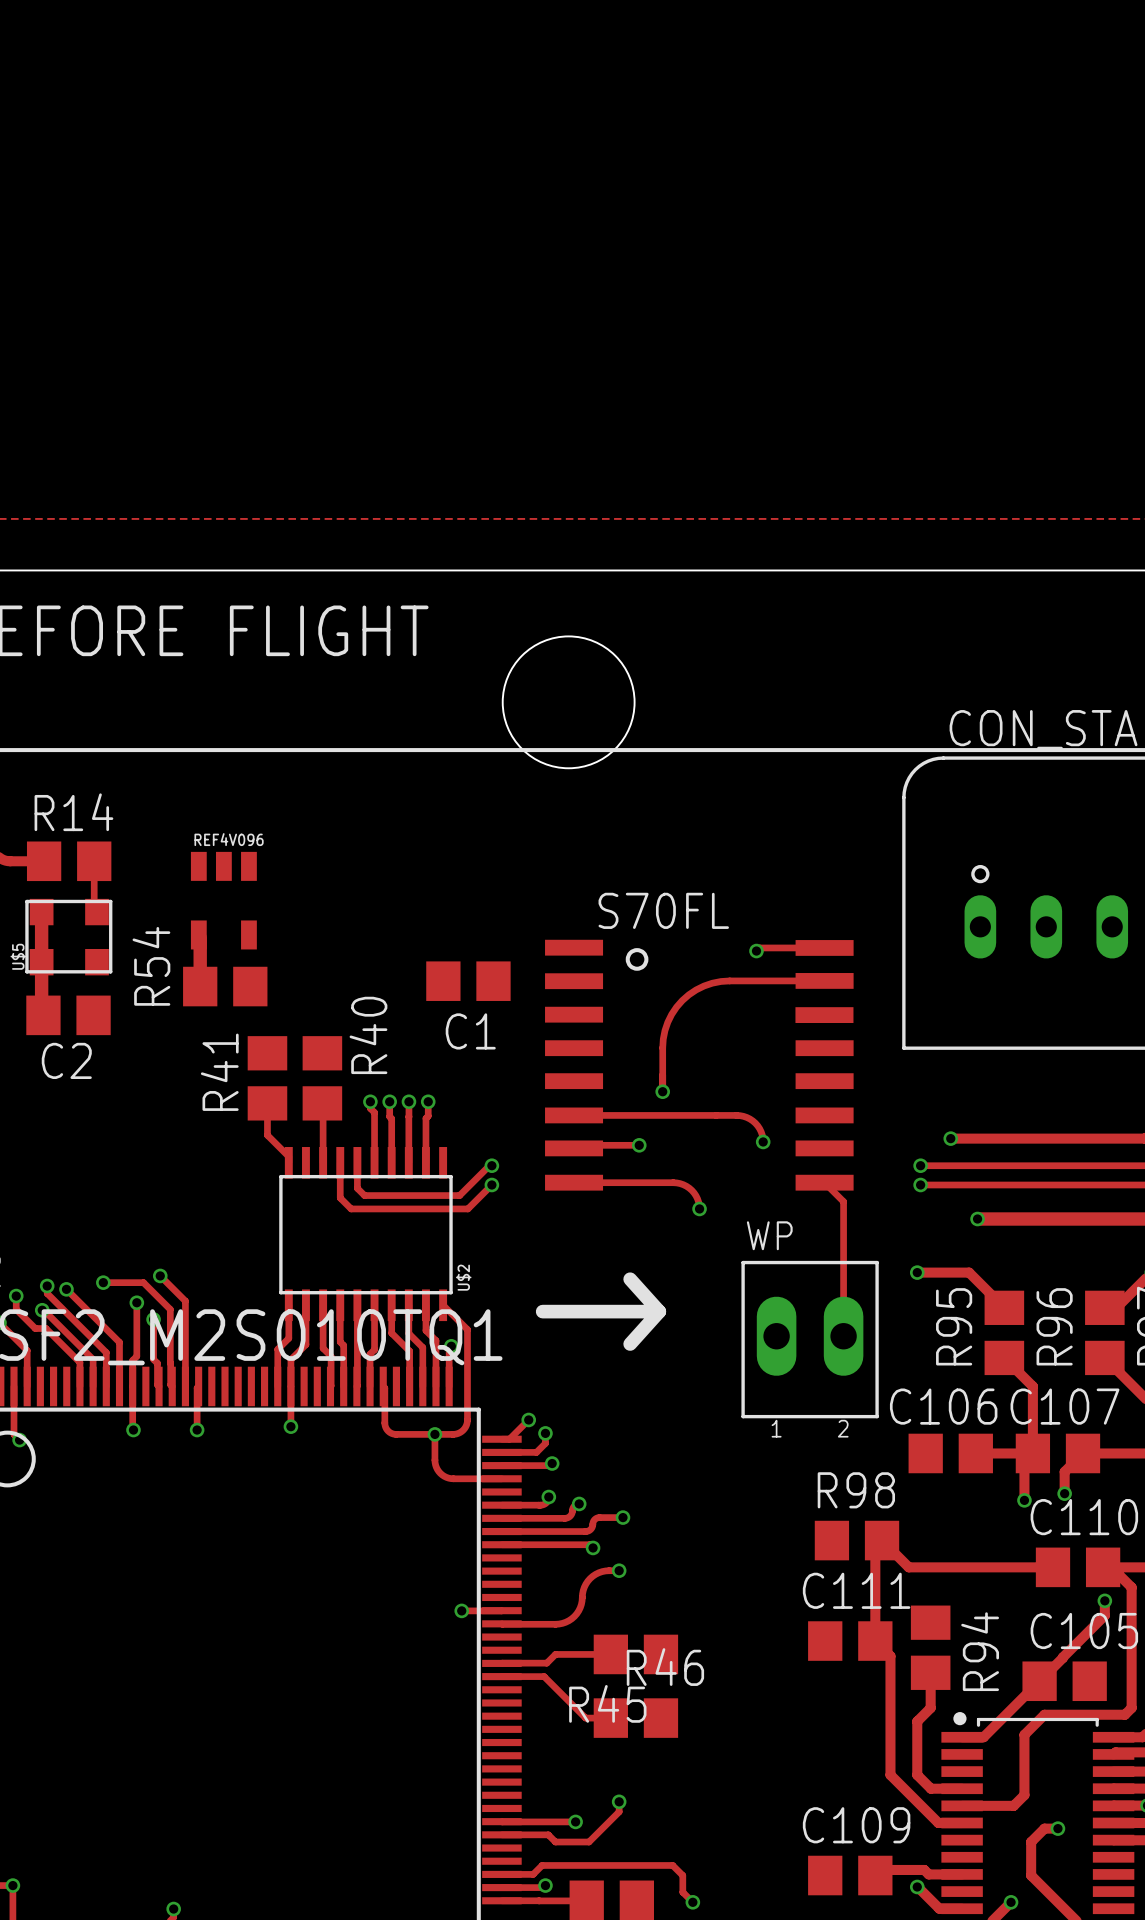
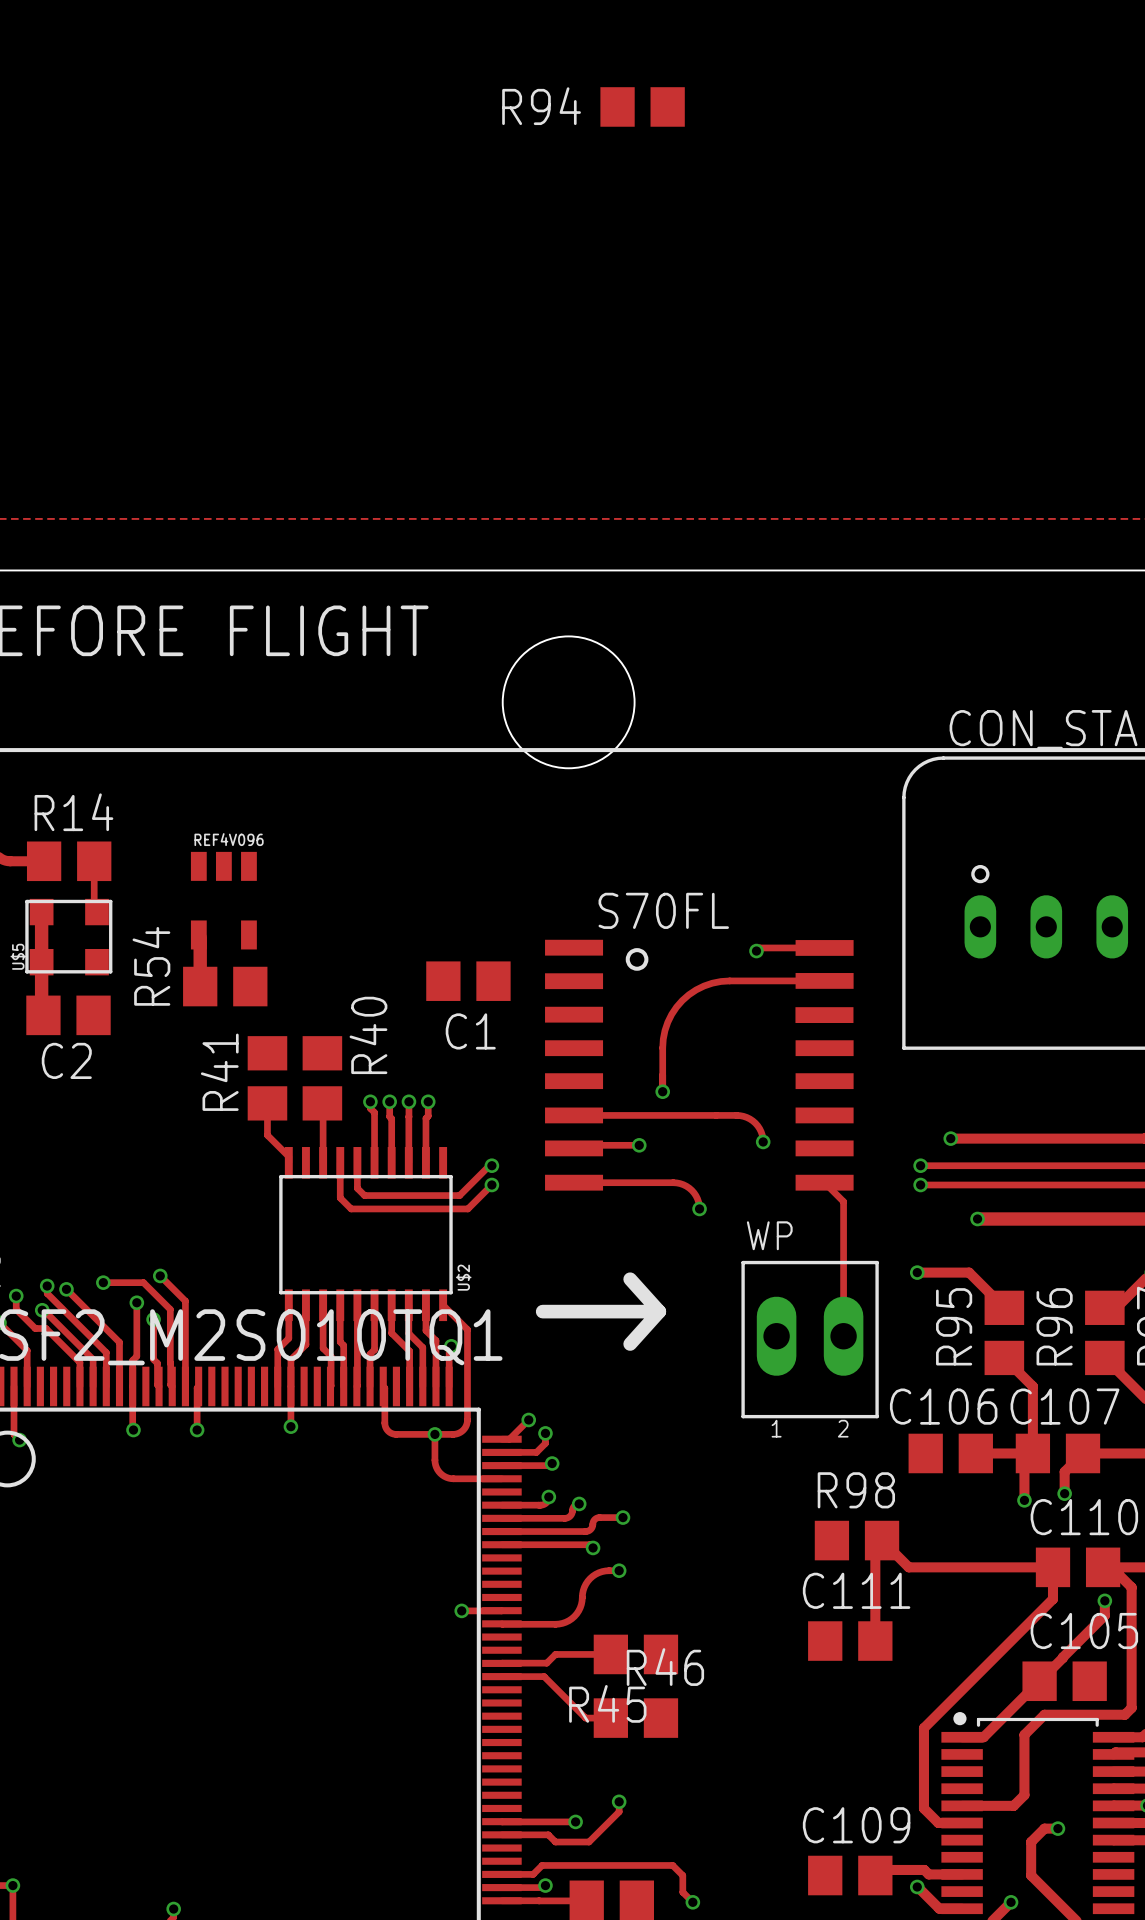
track: (875, 1641) (890, 1656) (890, 1775) (923, 1808) -> (1052, 1567) (1052, 1599) (923, 1728) (923, 1808)
R94 rotation: 0° (930, 1647) -> 90° clockwise (642, 106)
R94 position: (930, 1647) -> (642, 106)
R94 name position: R94 (980, 1651) -> R94 (541, 106)
track: (930, 1672) (930, 1708) (917, 1721) (917, 1775) (930, 1788) (962, 1788) -> none

